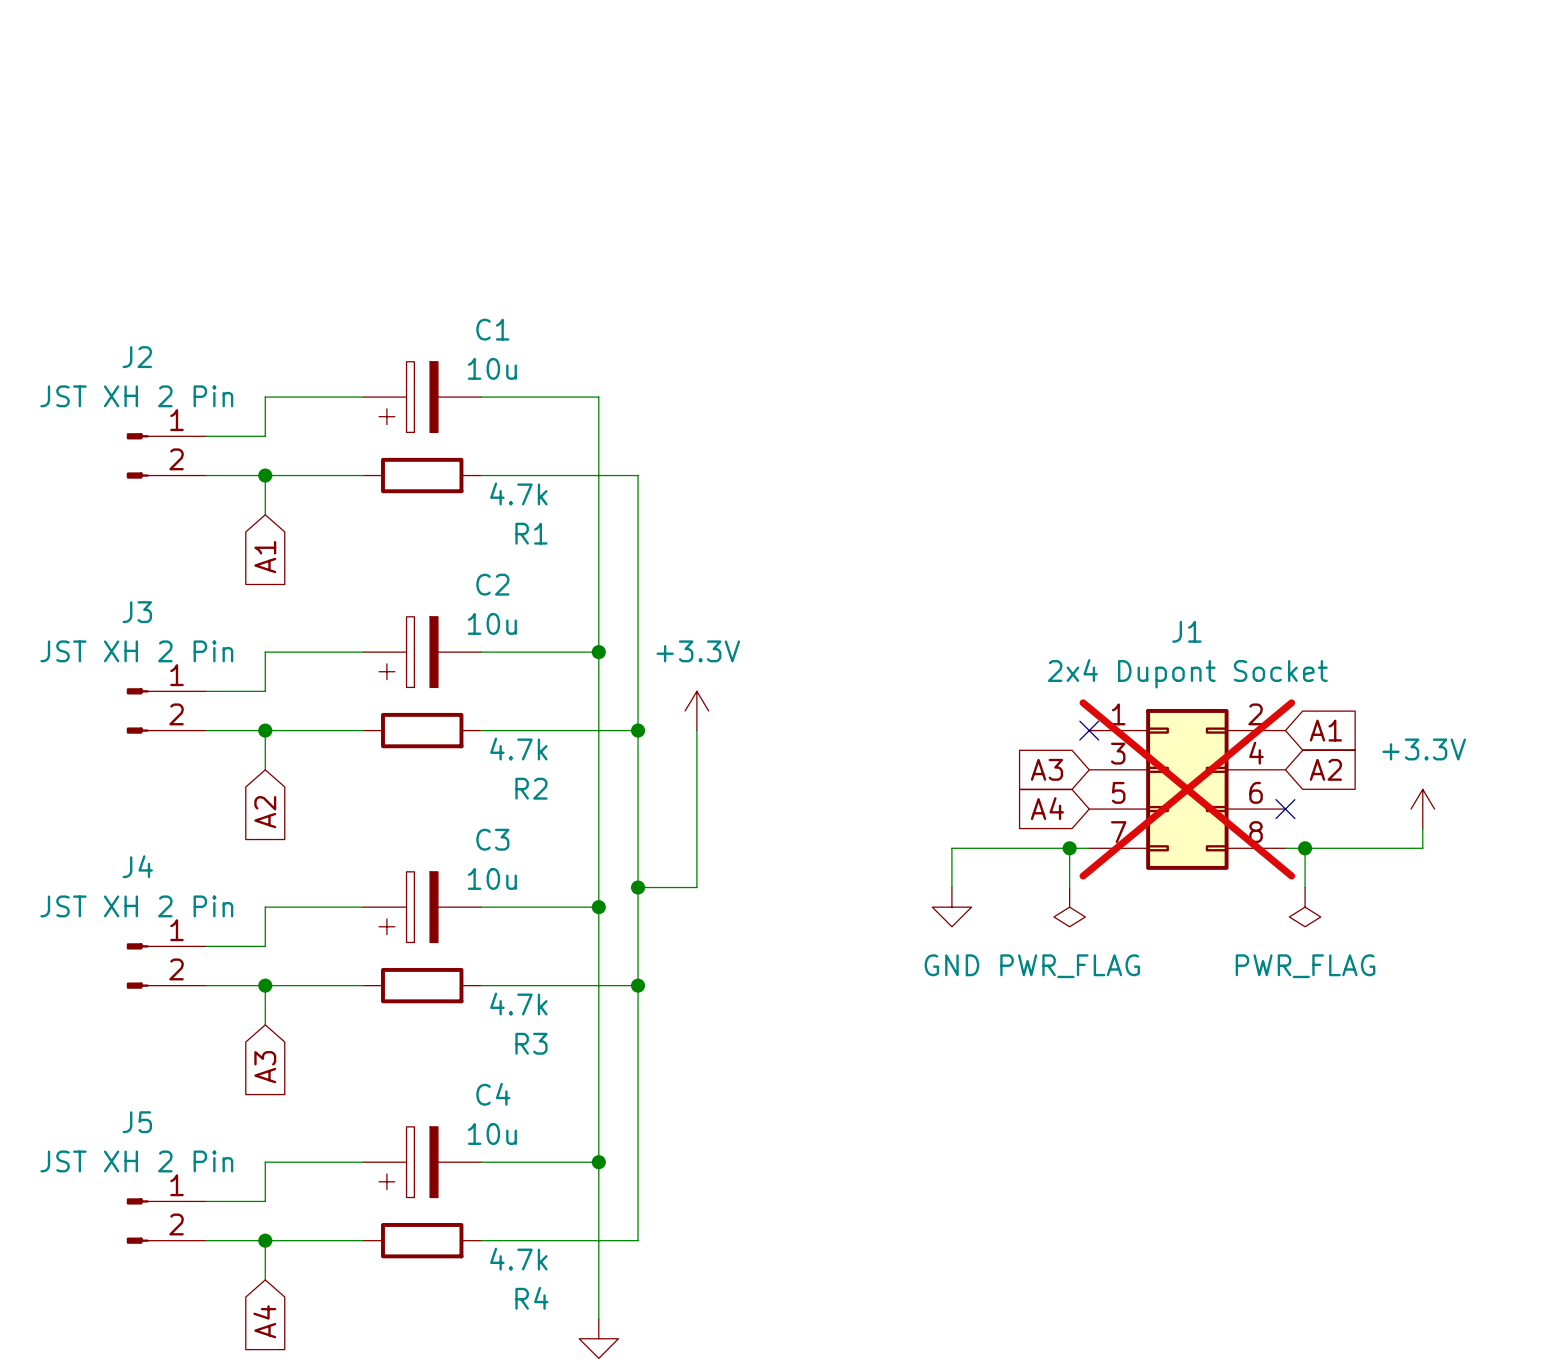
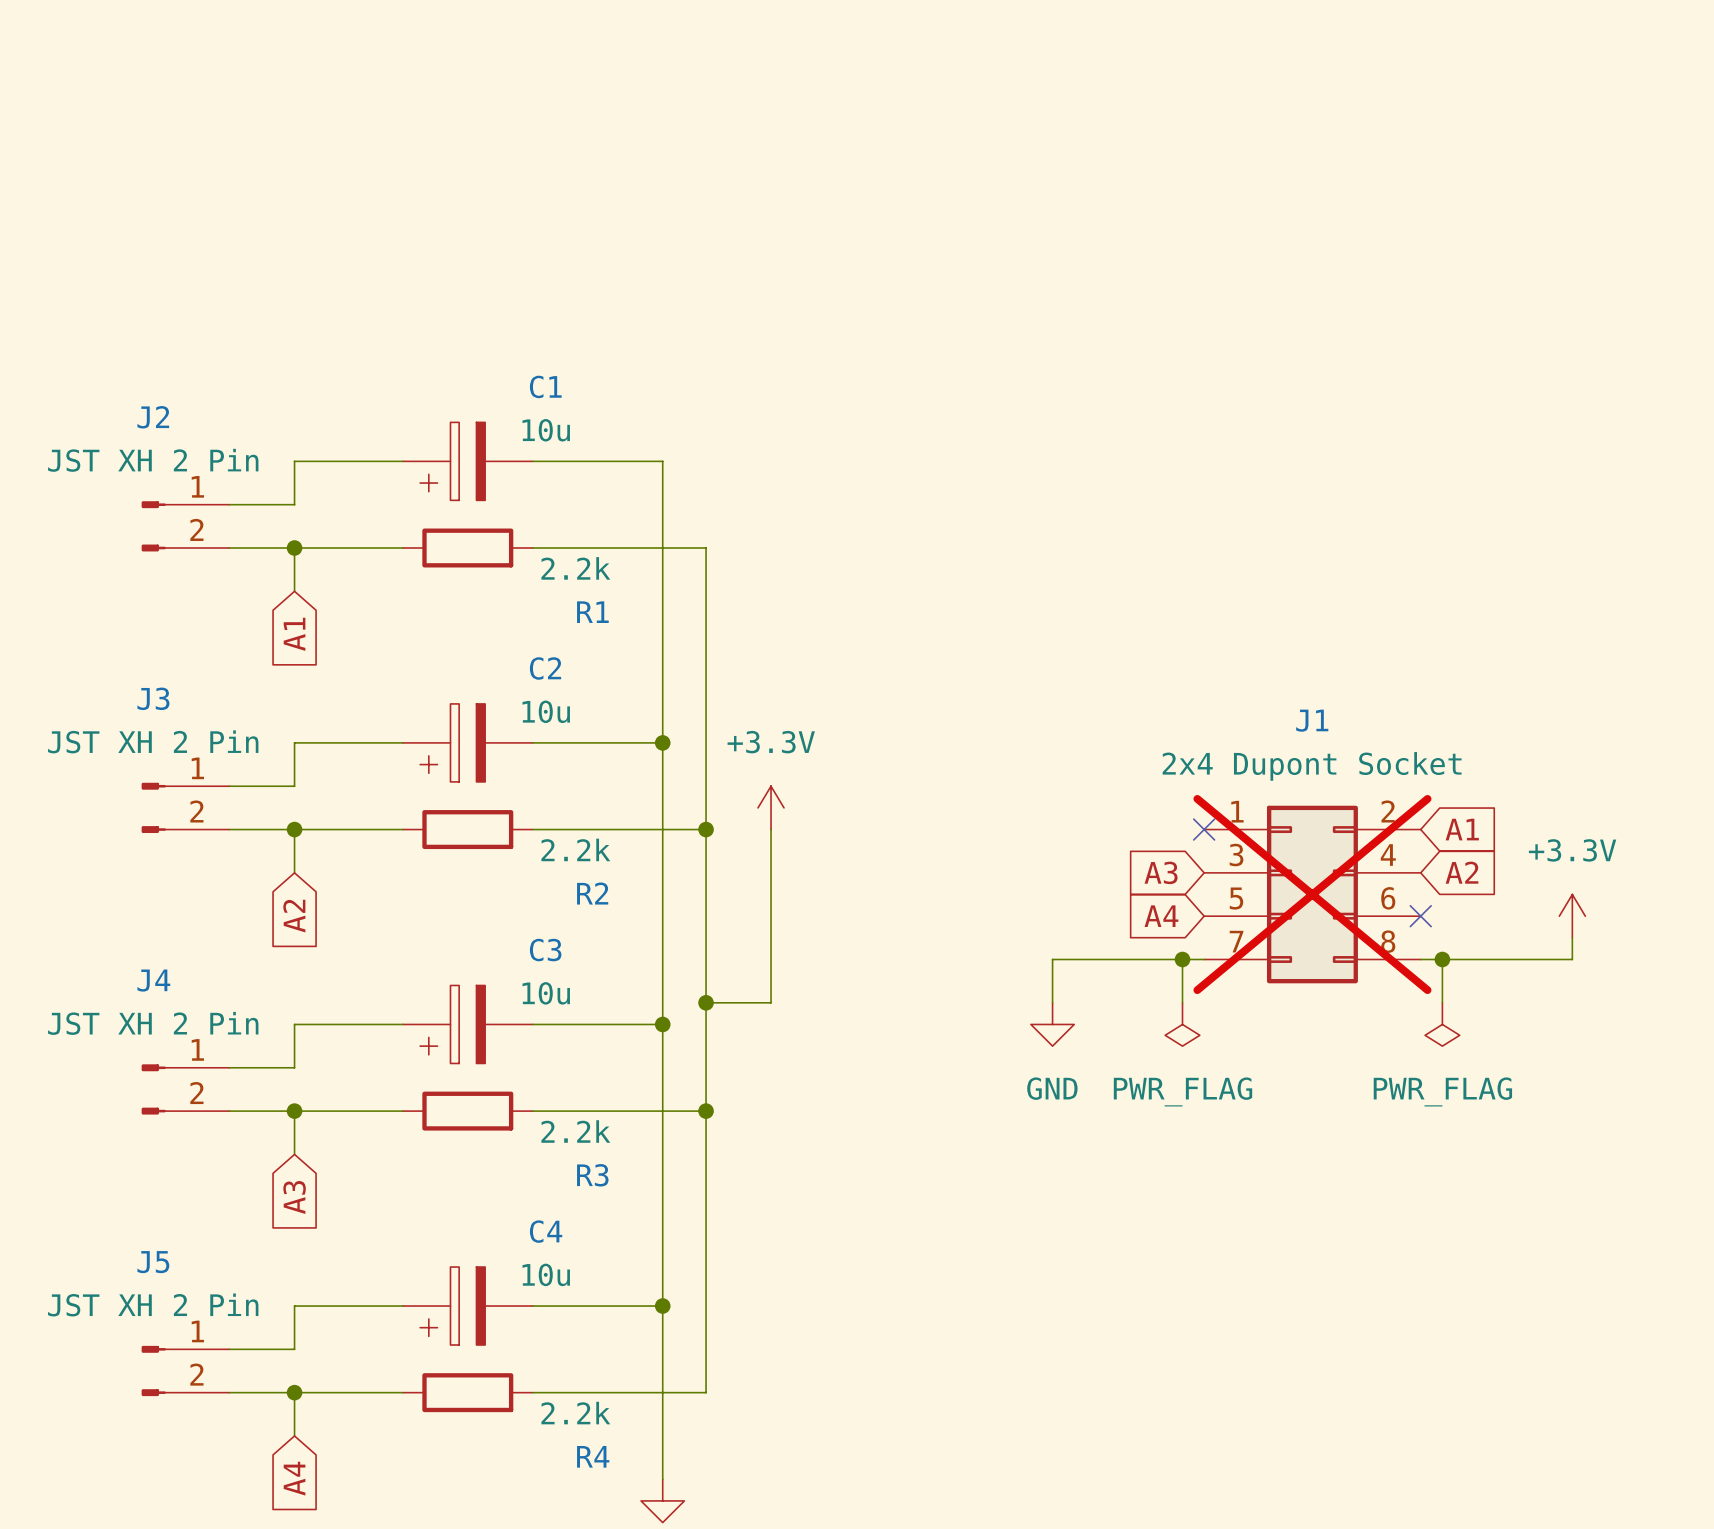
R1 value: 4.7k (518, 493) -> 2.2k (575, 568)
R2 value: 4.7k (518, 749) -> 2.2k (575, 849)
R3 value: 4.7k (518, 1004) -> 2.2k (575, 1131)
R4 value: 4.7k (518, 1259) -> 2.2k (575, 1413)

